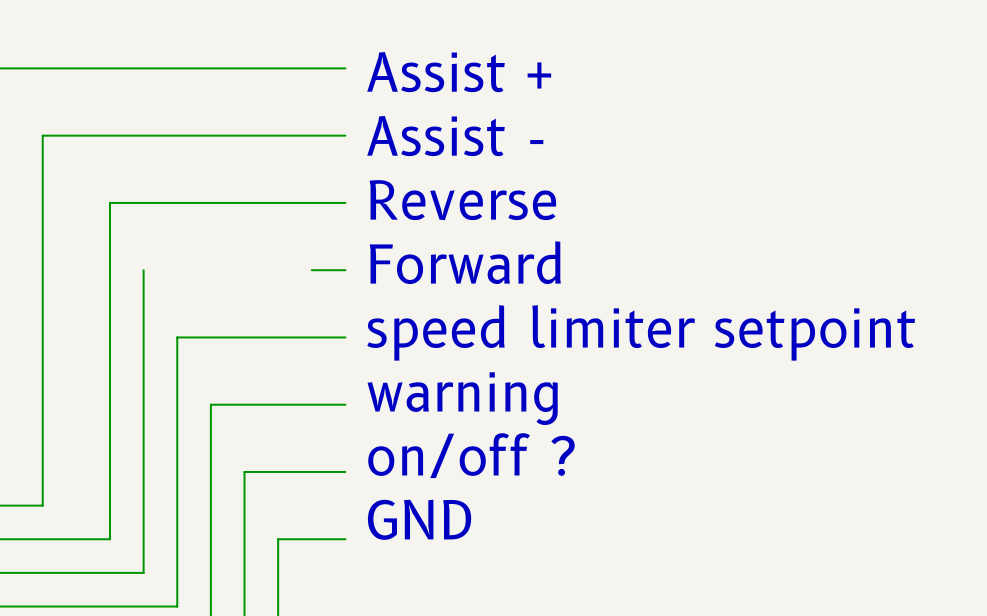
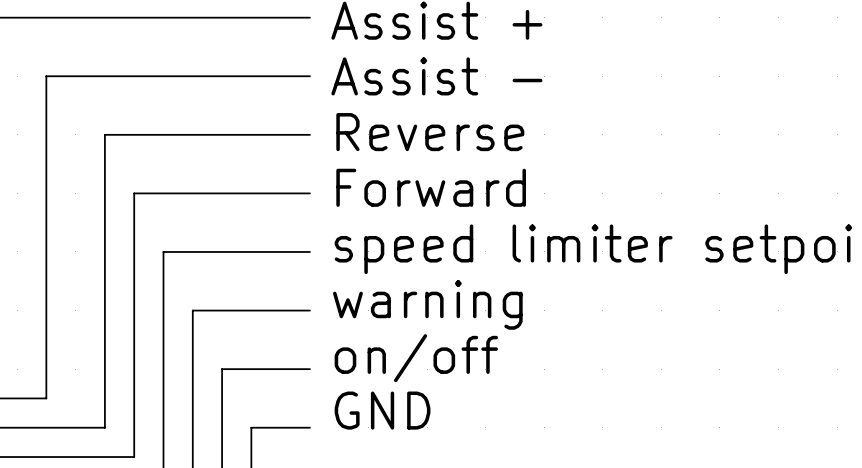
wire: none -> (134, 193) (280, 193)
text: on/off ? (471, 455) -> on/off (416, 358)

